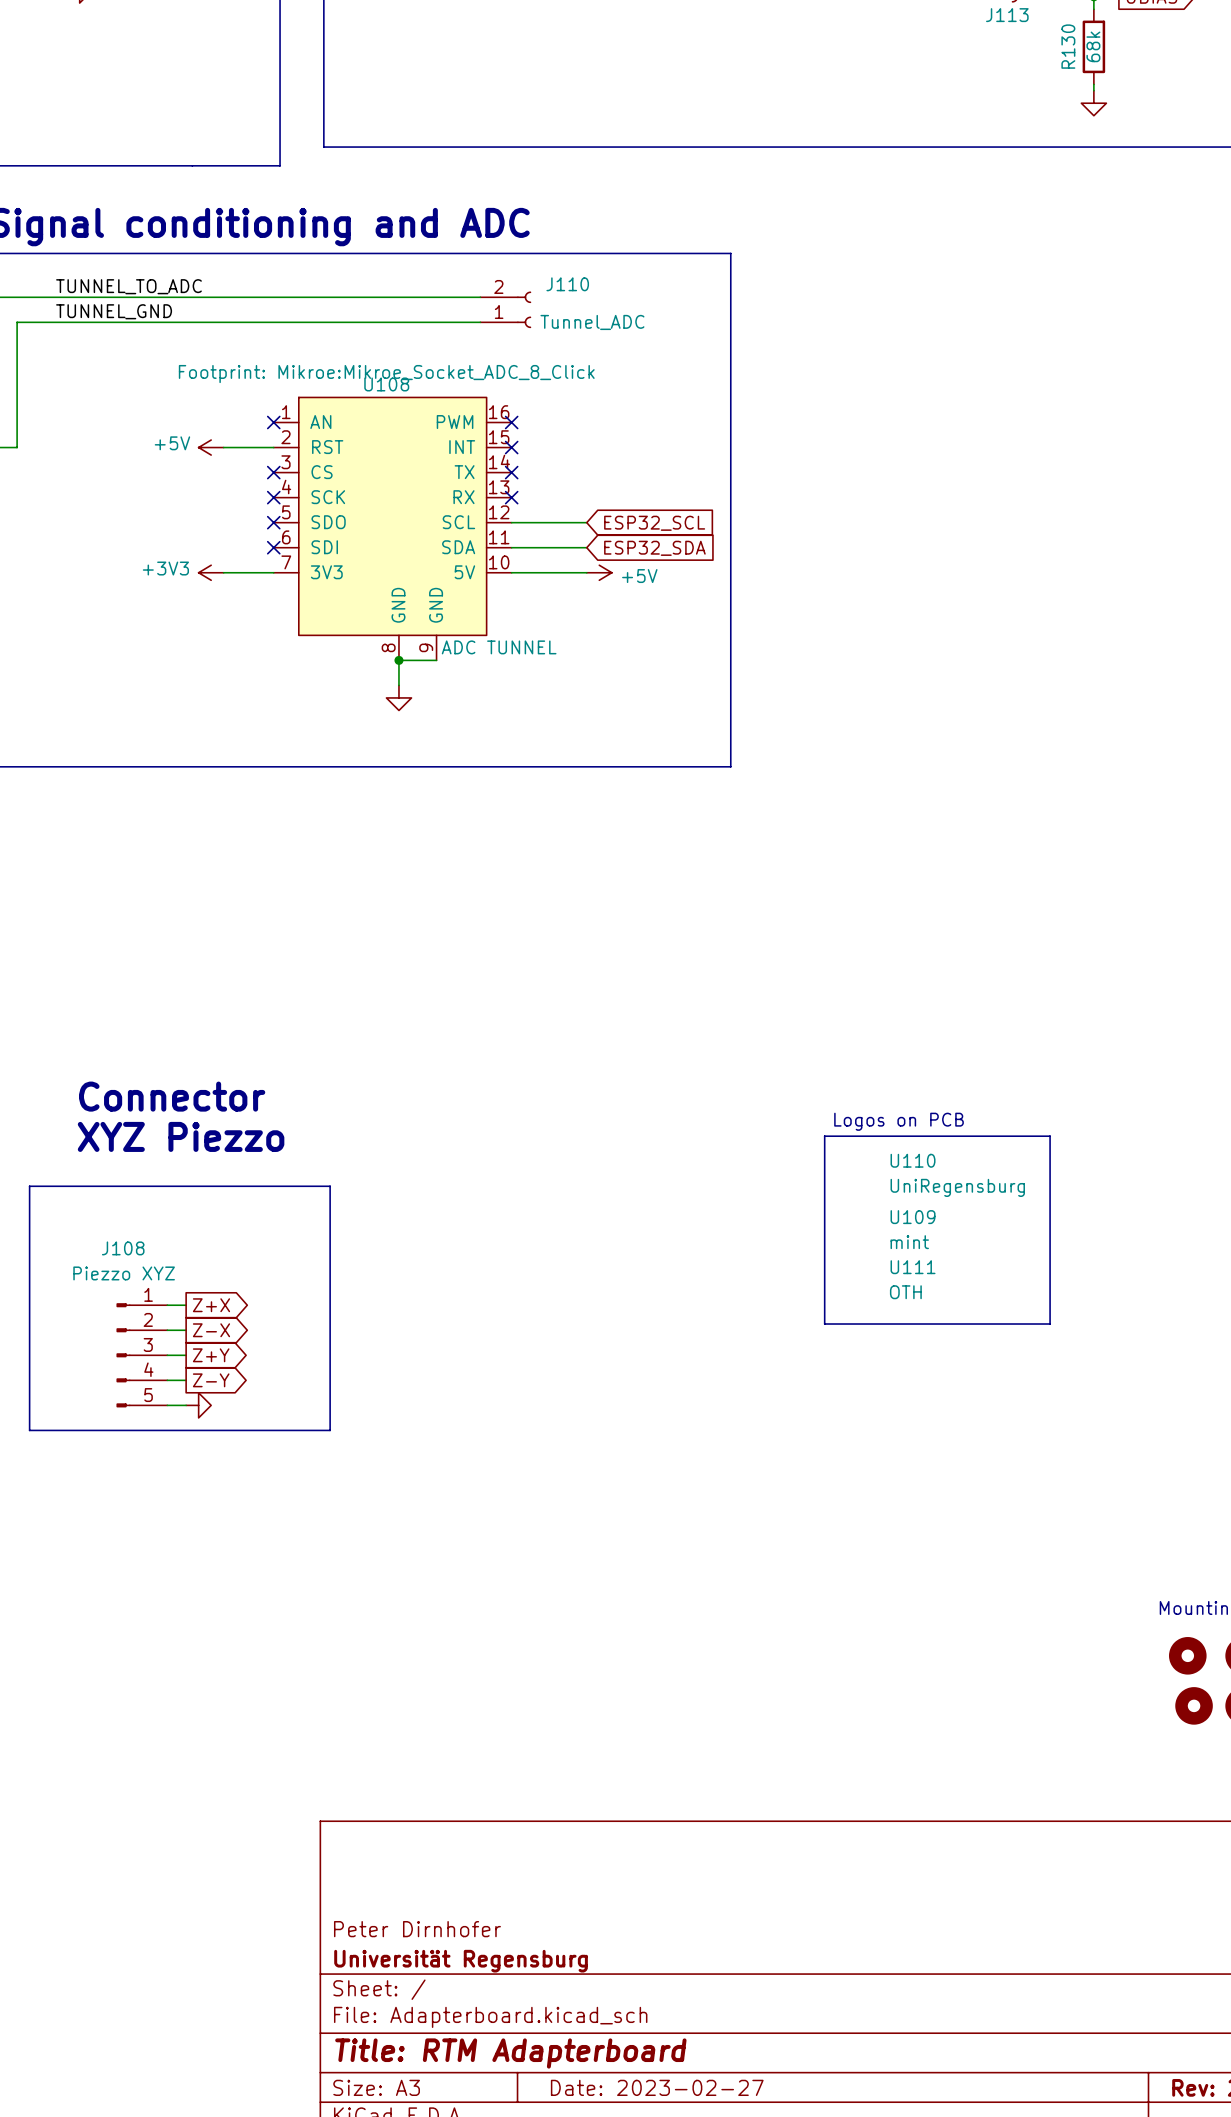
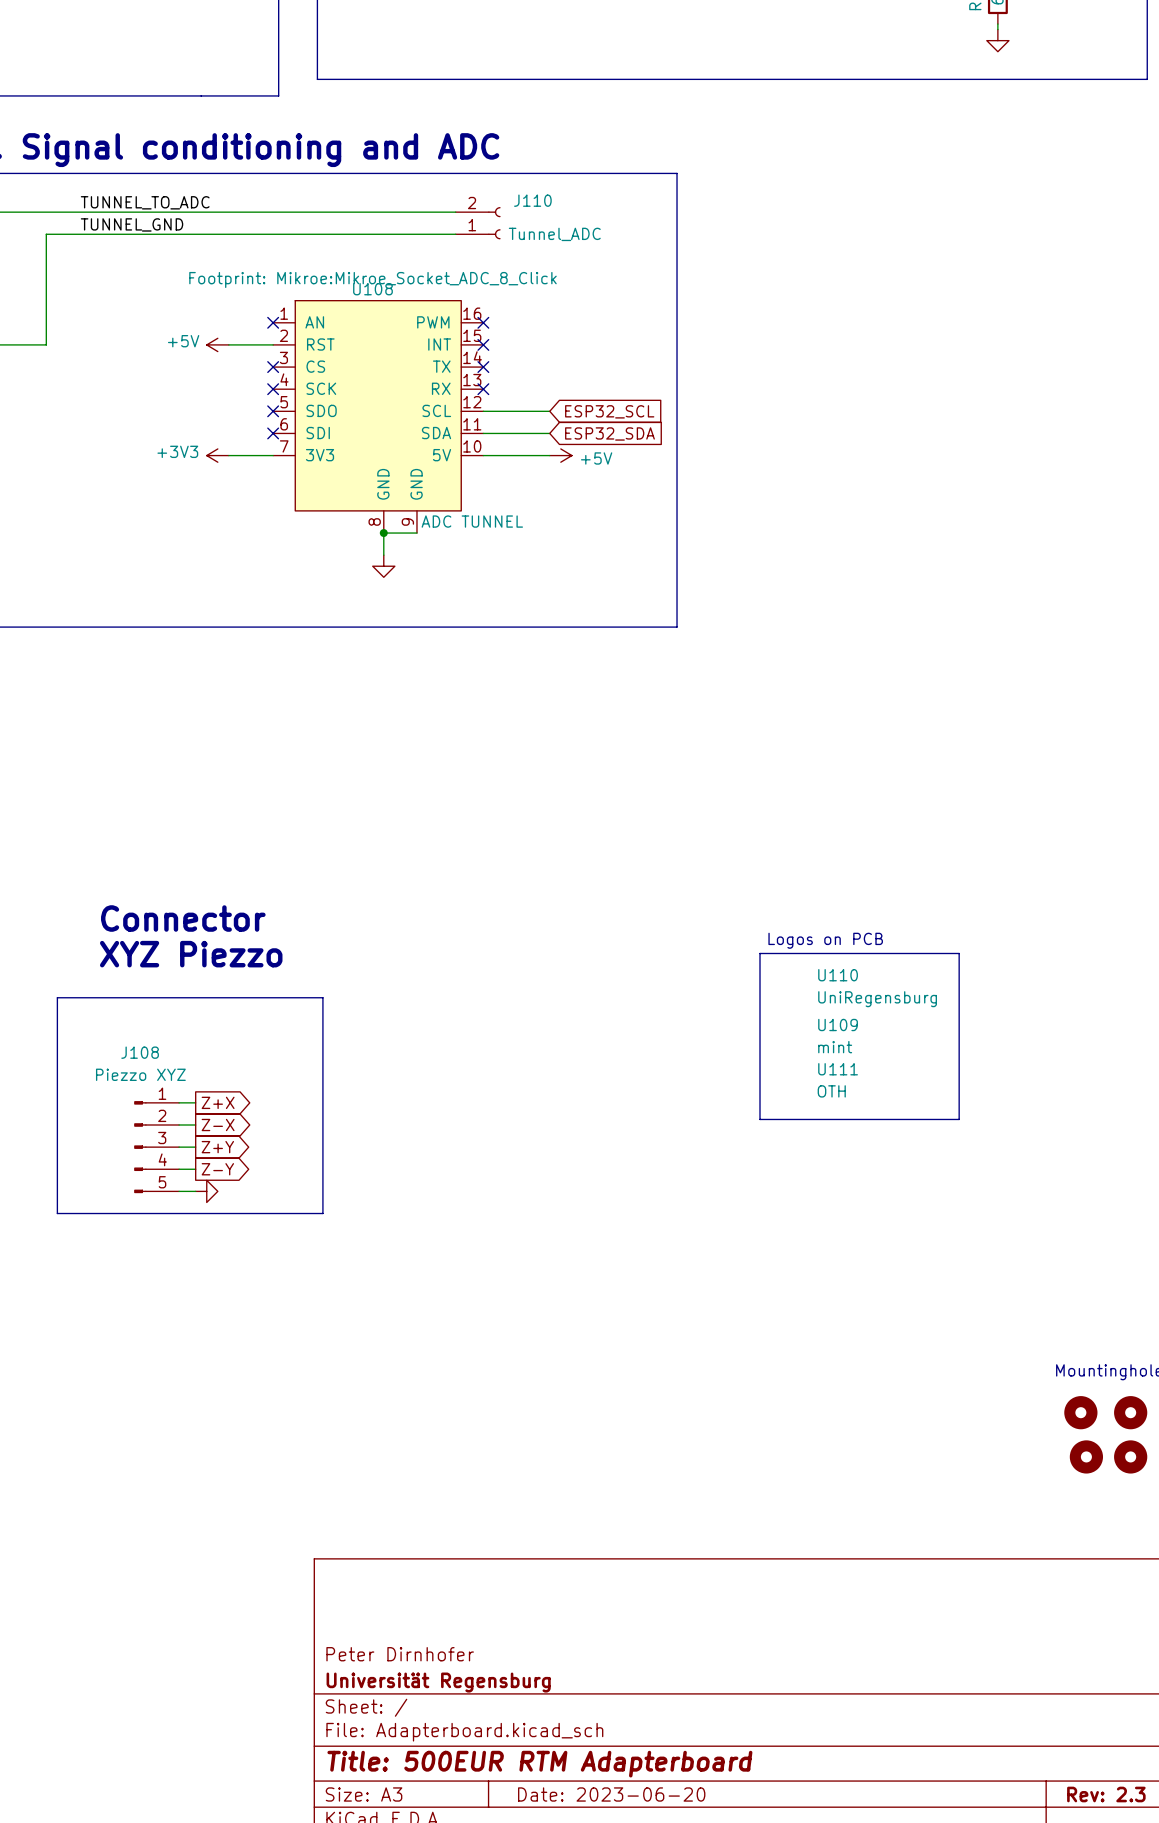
title block: Title: RTM Adapterboard (510, 2053) -> Title: 500EUR RTM Adapterboard (539, 1764)
title block: Date: 2023-02-27 (657, 2087) -> Date: 2023-06-20 (611, 1794)

